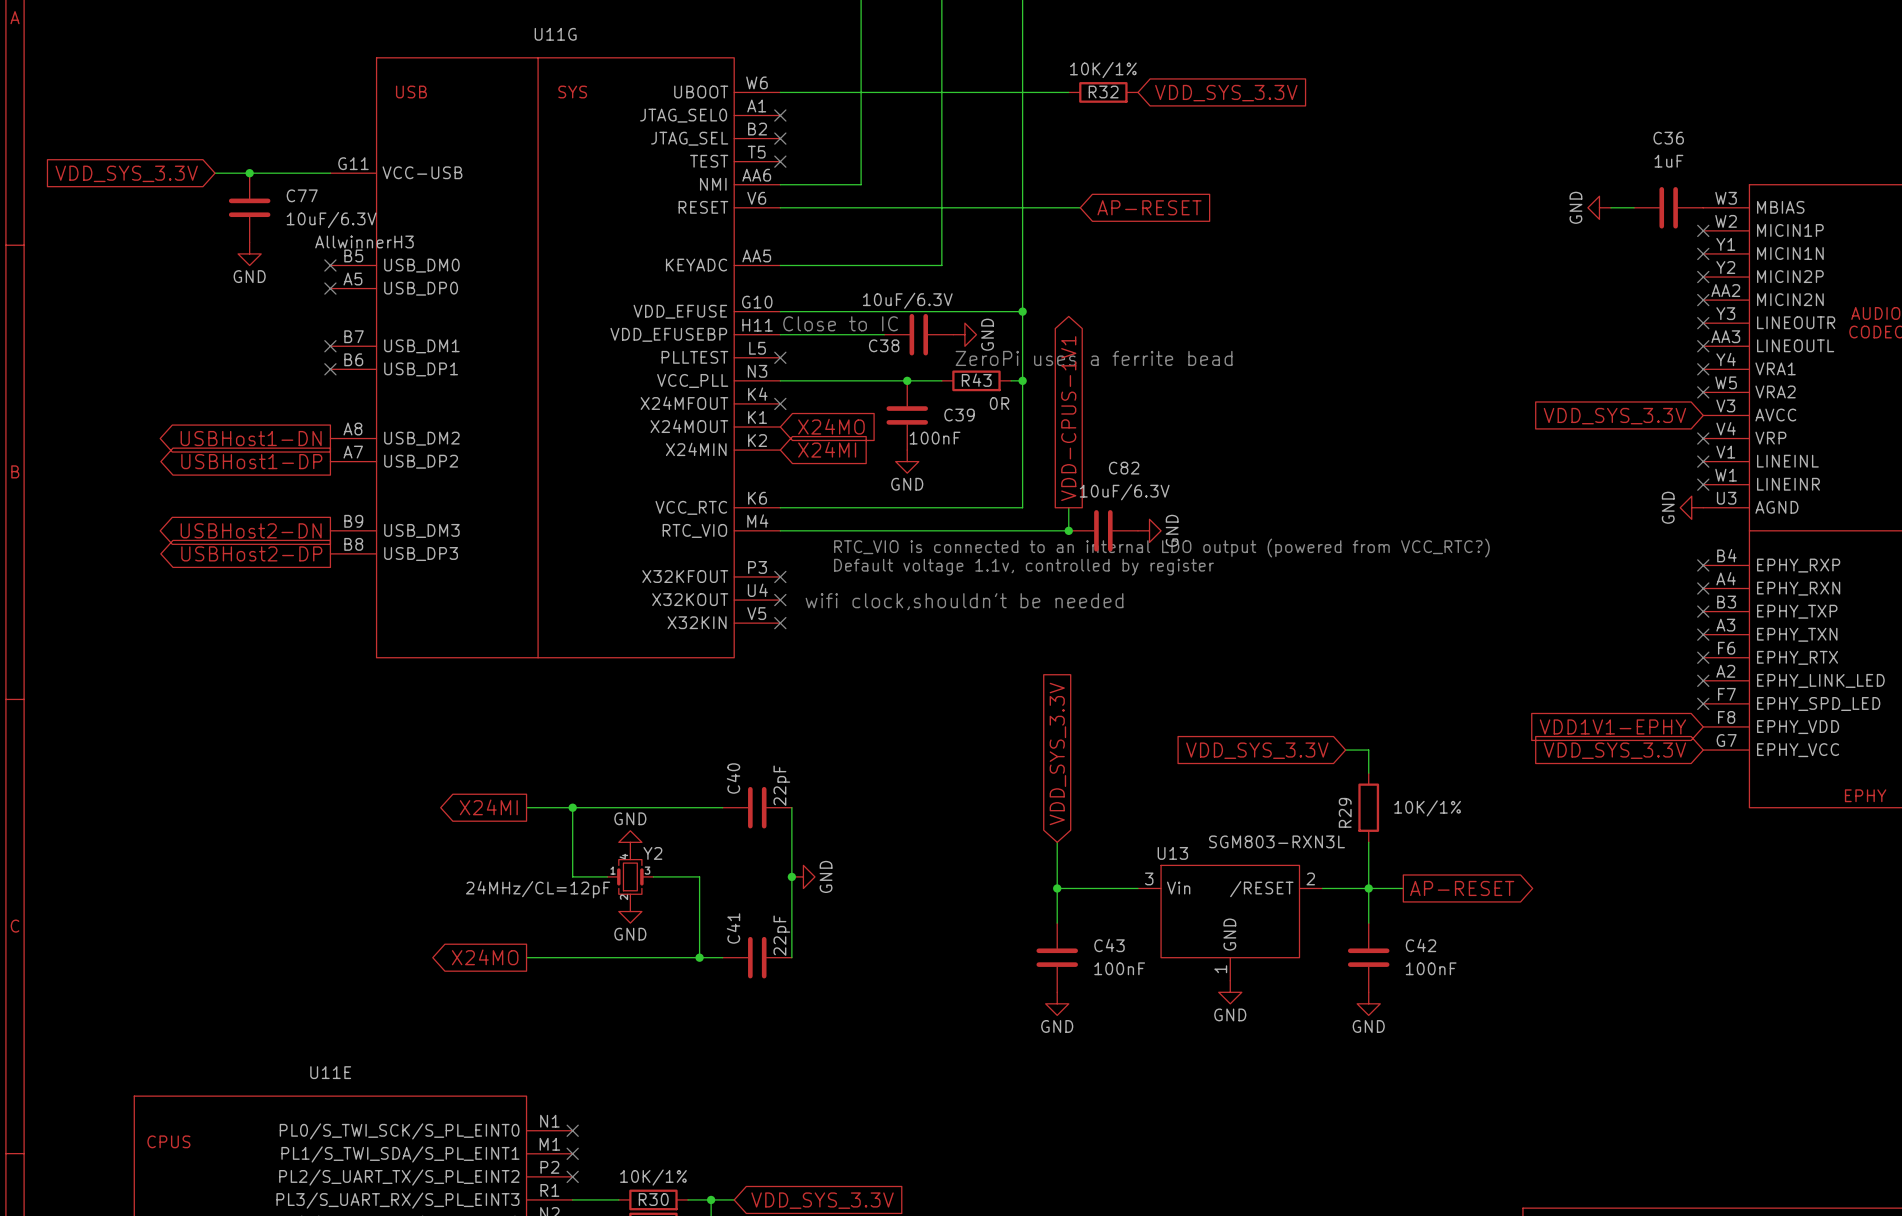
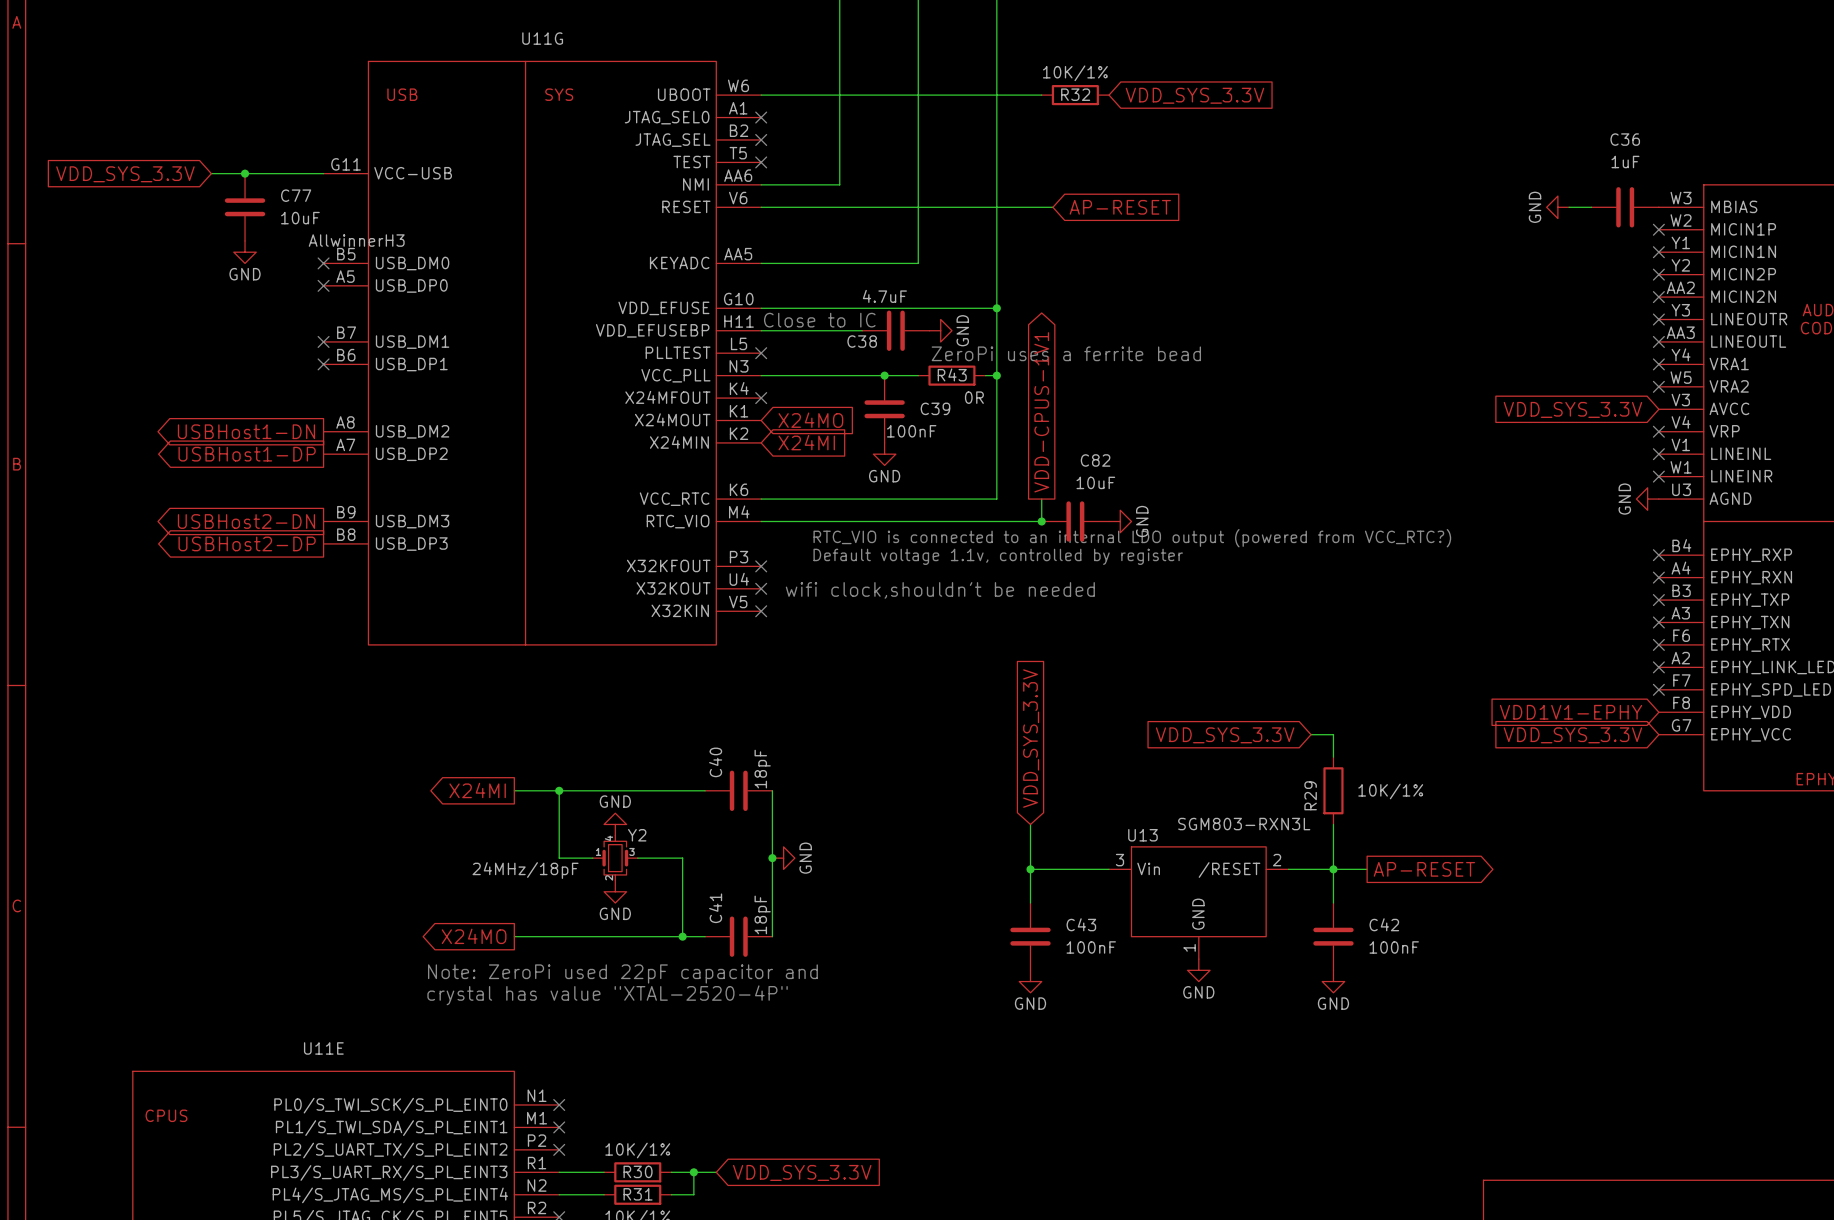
C77 value: 10uF/6.3V (331, 220) -> 10uF (300, 218)
C38 value: 10uF/6.3V (907, 300) -> 4.7uF (884, 296)
C82 value: 10uF/6.3V (1124, 492) -> 10uF (1095, 482)
C40 value: 22pF (781, 785) -> 18pF (762, 769)
Y2 value: 24MHz/CL=12pF (538, 889) -> 24MHz/18pF (525, 870)
C41 value: 22pF (781, 935) -> 18pF (762, 914)
text: none -> Note: ZeroPi used 22pF capacitor and (622, 973)
text: none -> crystal has value "XTAL-2520-4P" (607, 995)

